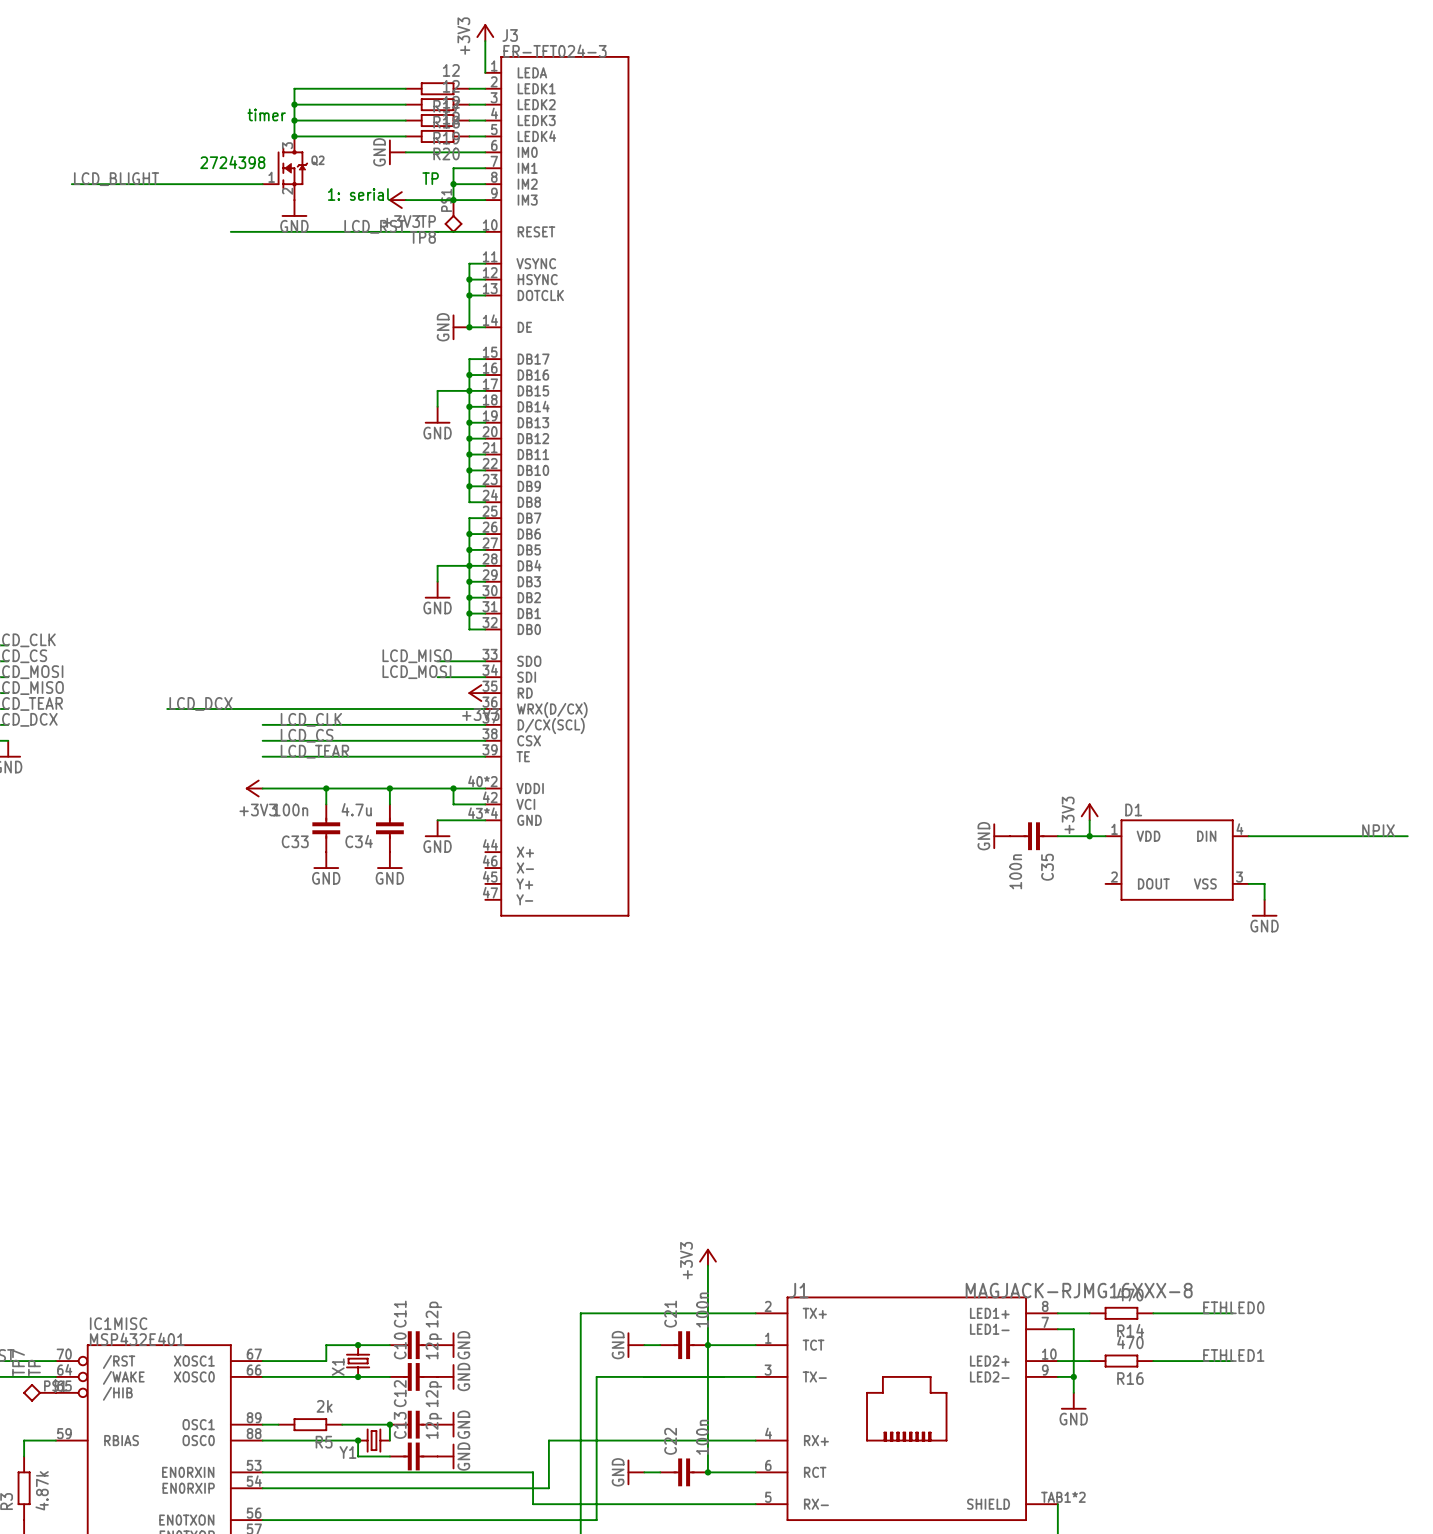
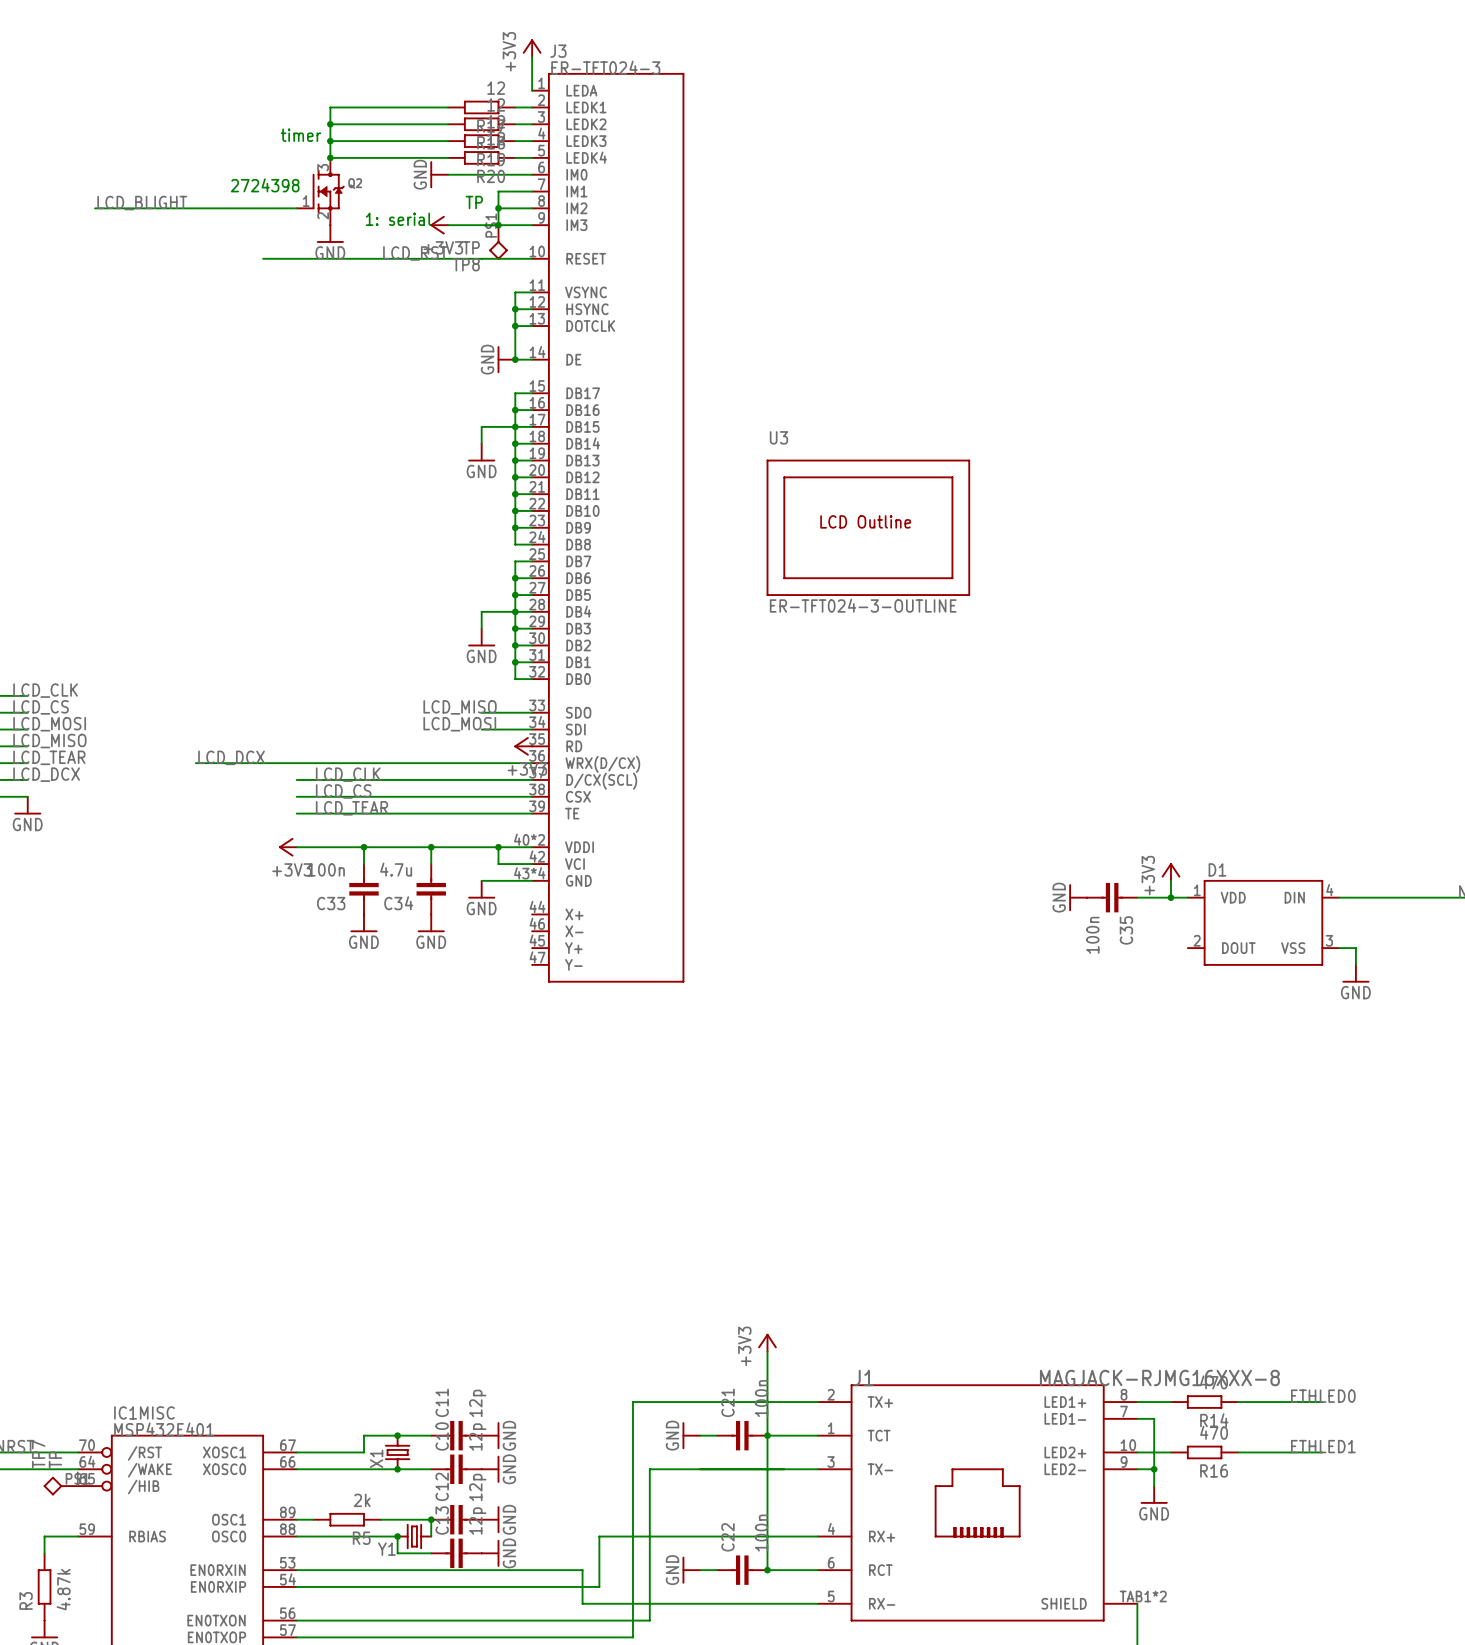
U3: none -> ER-TFT024-3-OUTLINE (868, 527)

